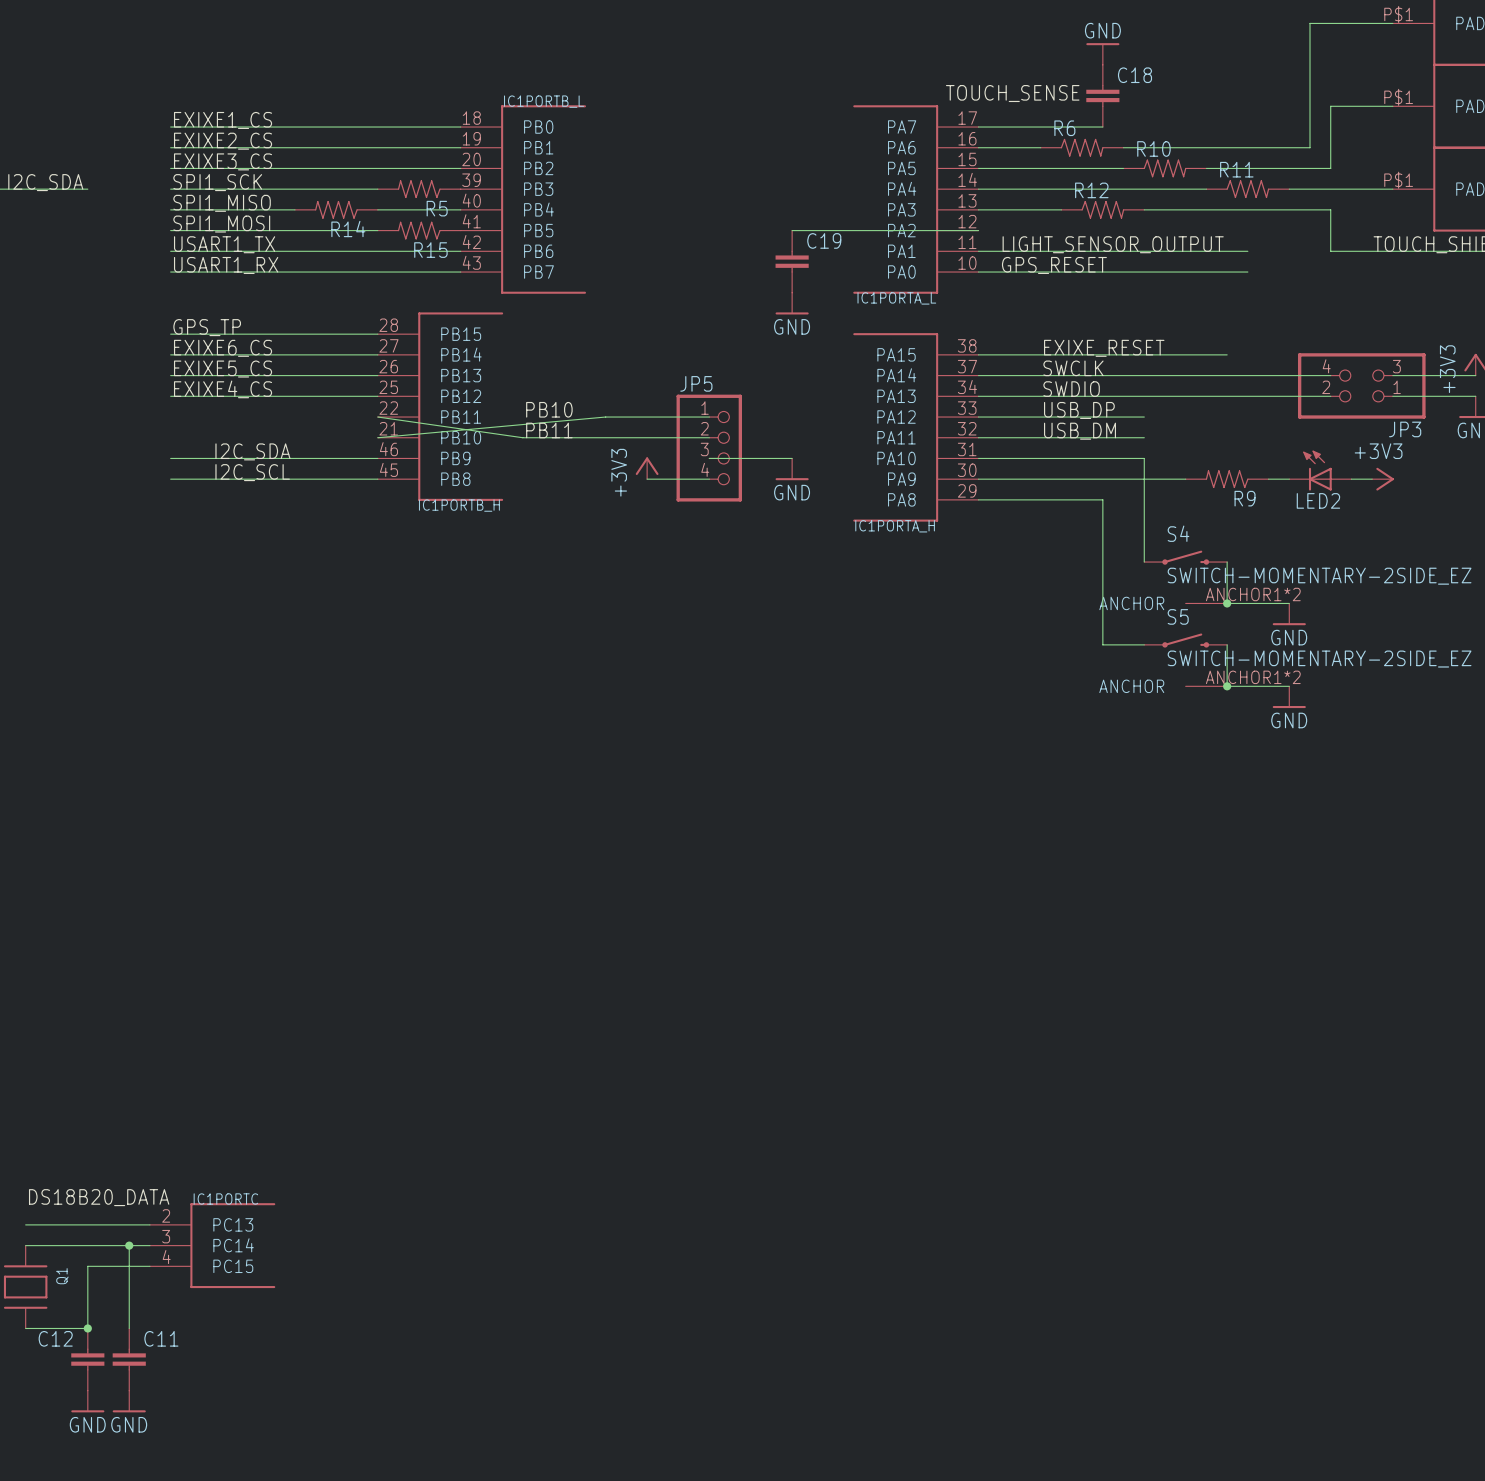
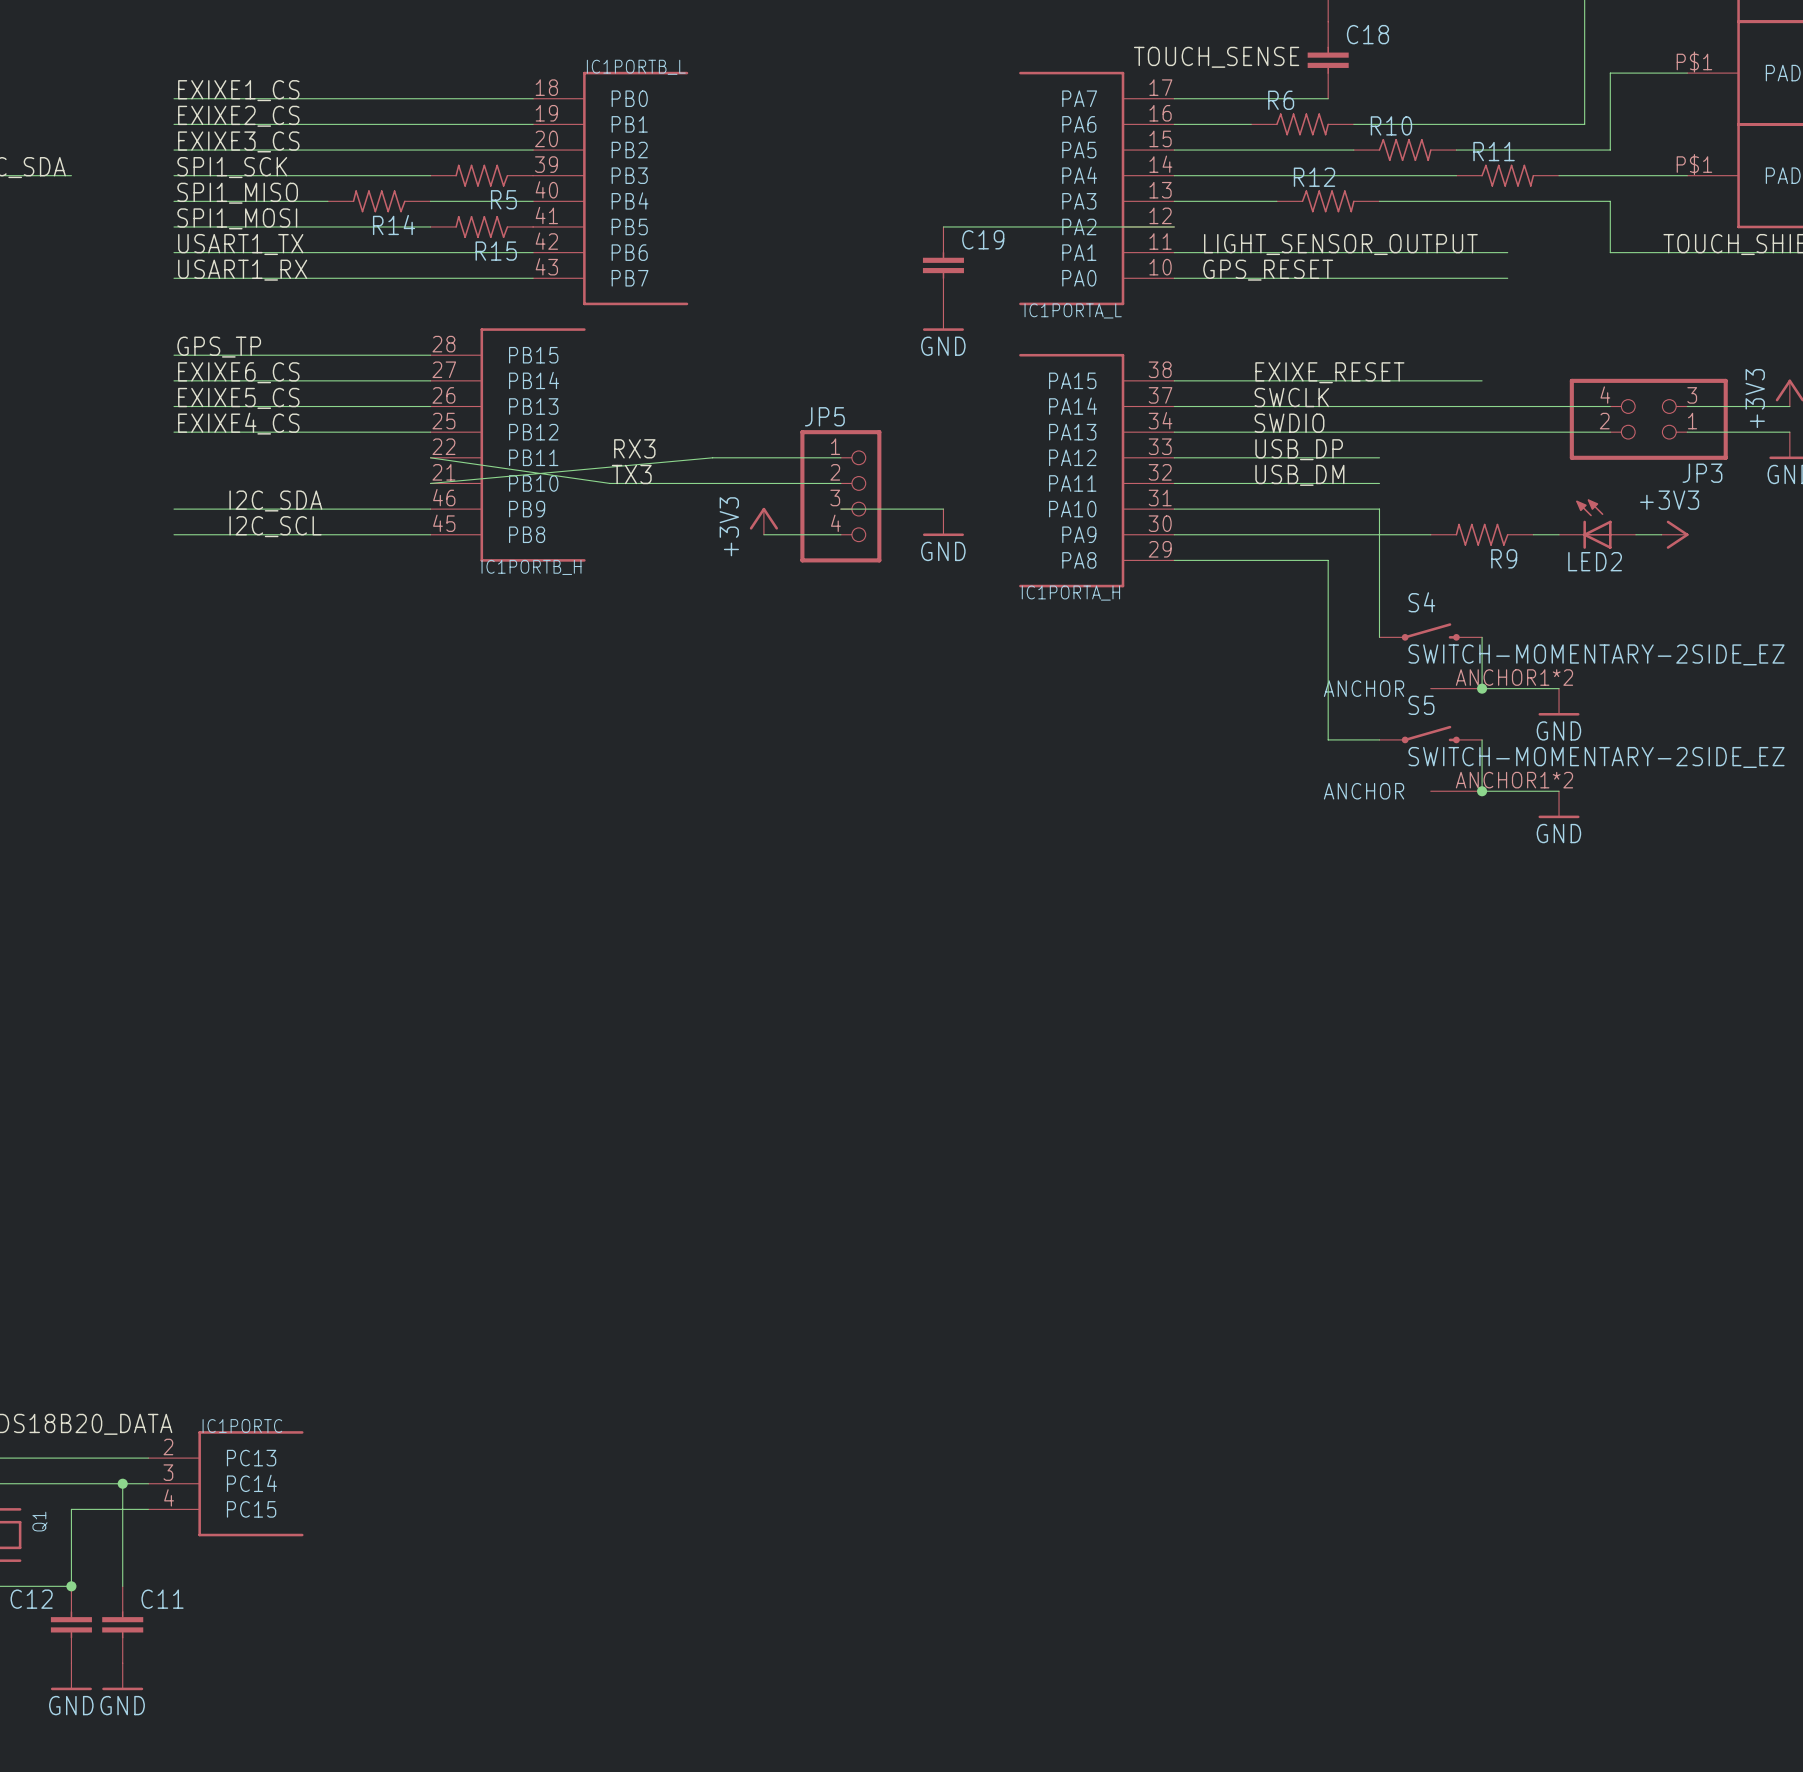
label: PB10 (549, 409) -> RX3 (634, 448)
label: PB11 (549, 430) -> TX3 (631, 474)

